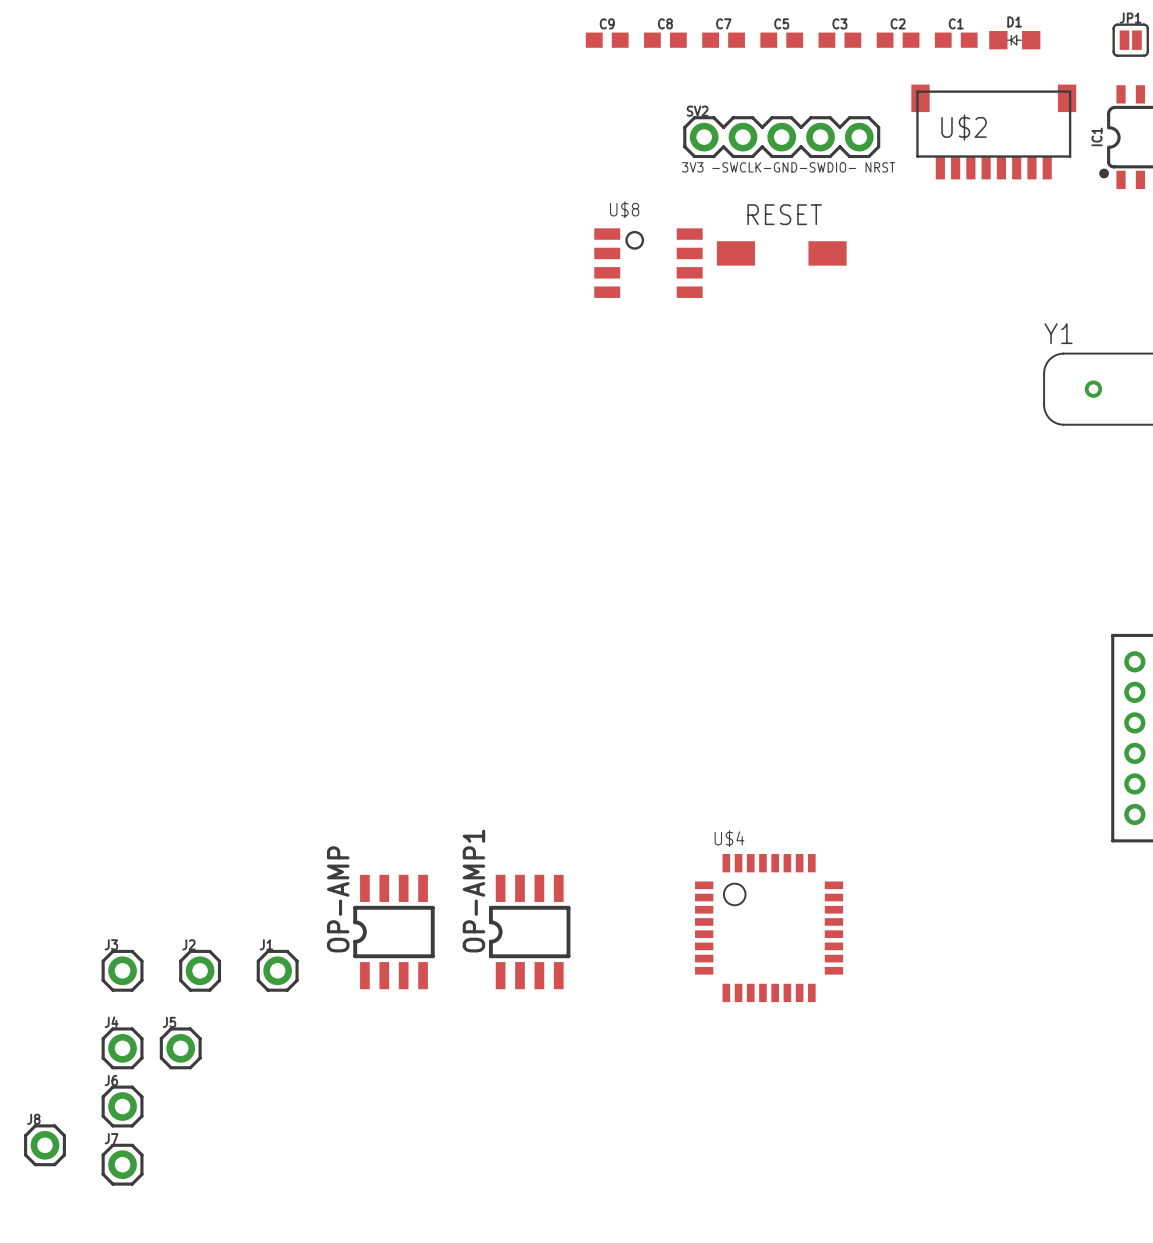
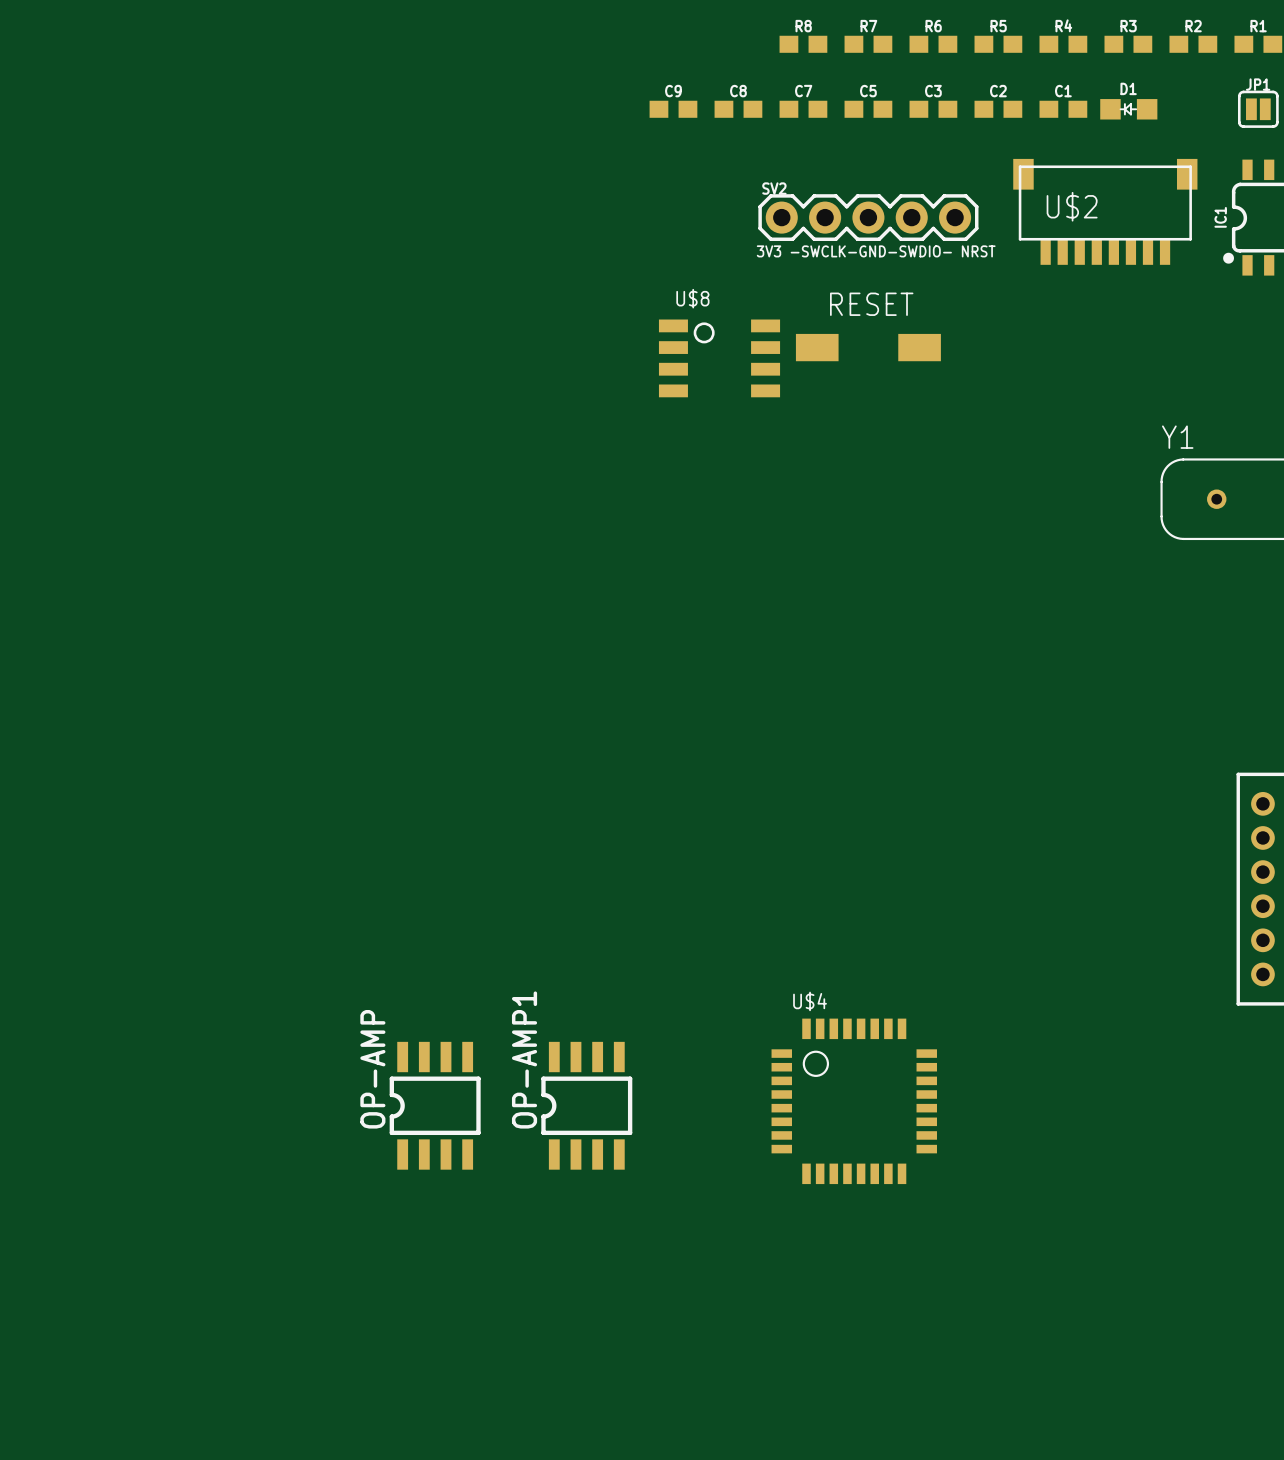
J3: (122, 970) -> none
J2: (200, 970) -> none
J1: (277, 970) -> none
J4: (122, 1048) -> none
J5: (180, 1048) -> none
J6: (122, 1106) -> none
J8: (44, 1145) -> none
J7: (122, 1164) -> none

